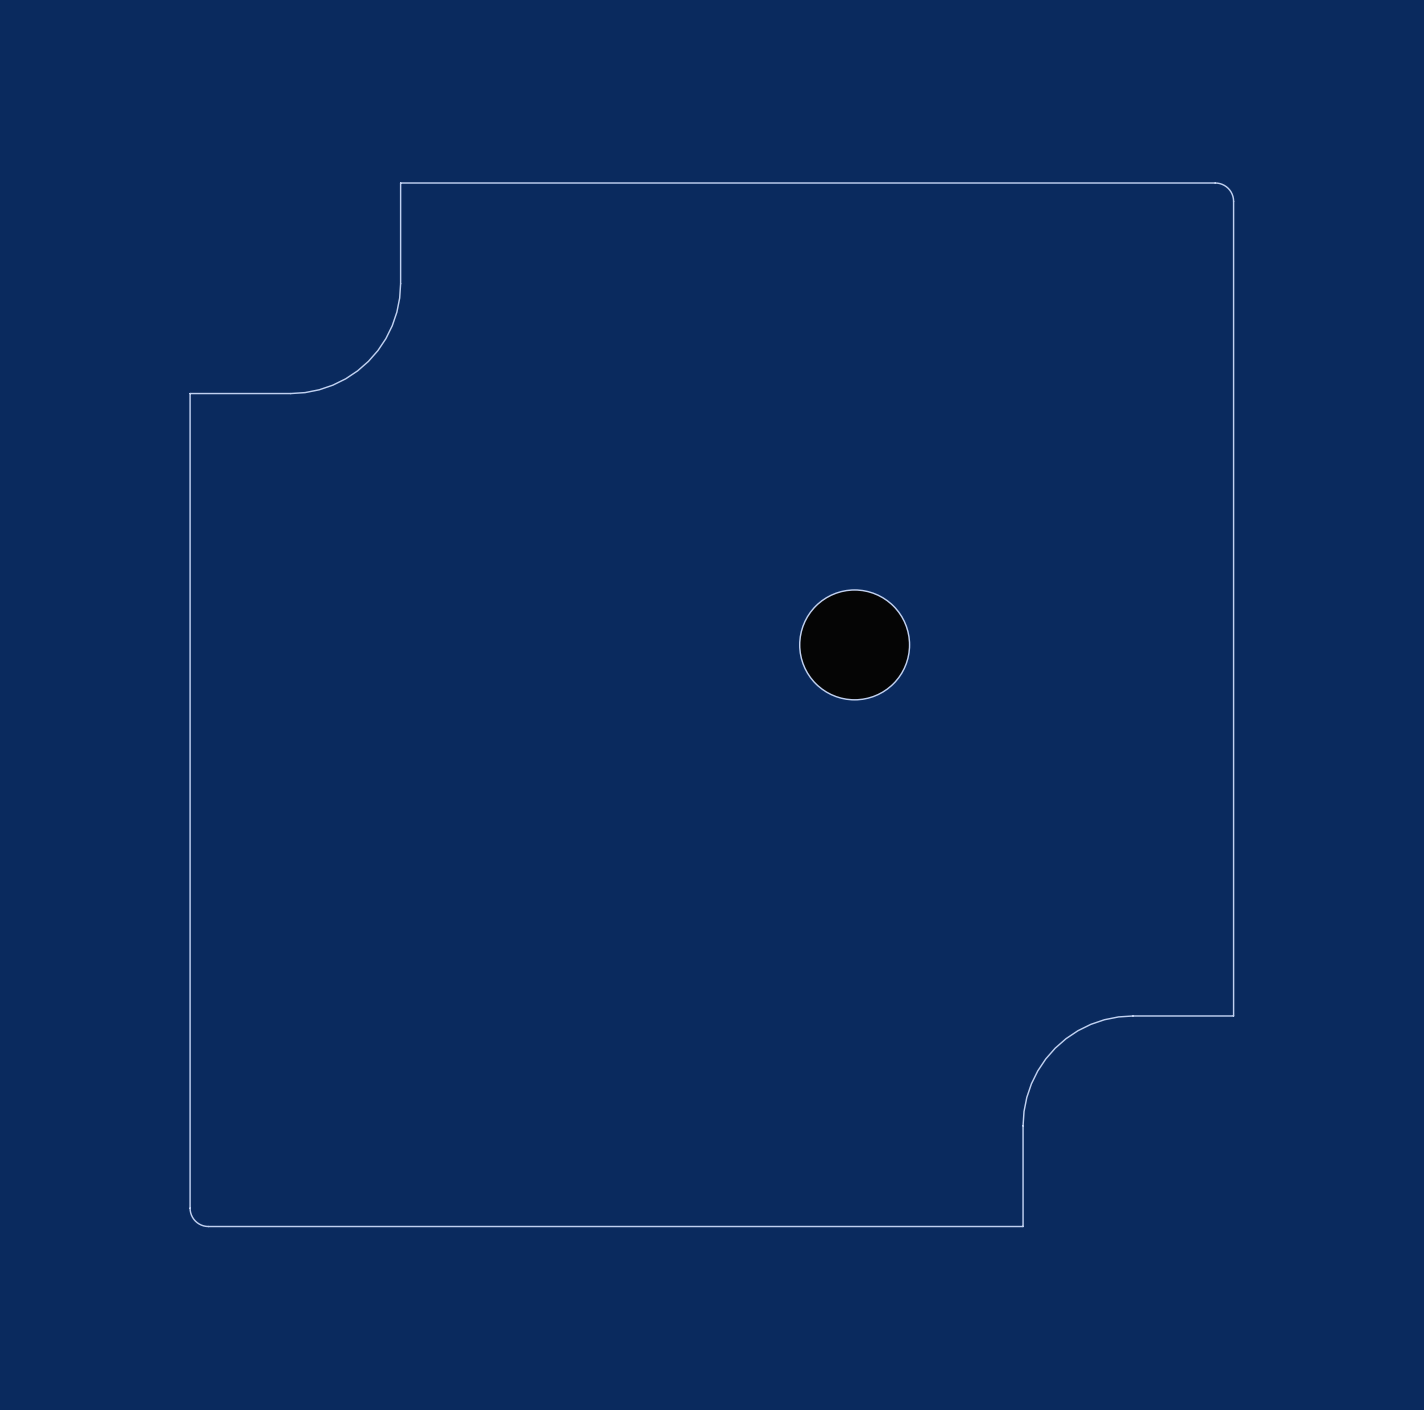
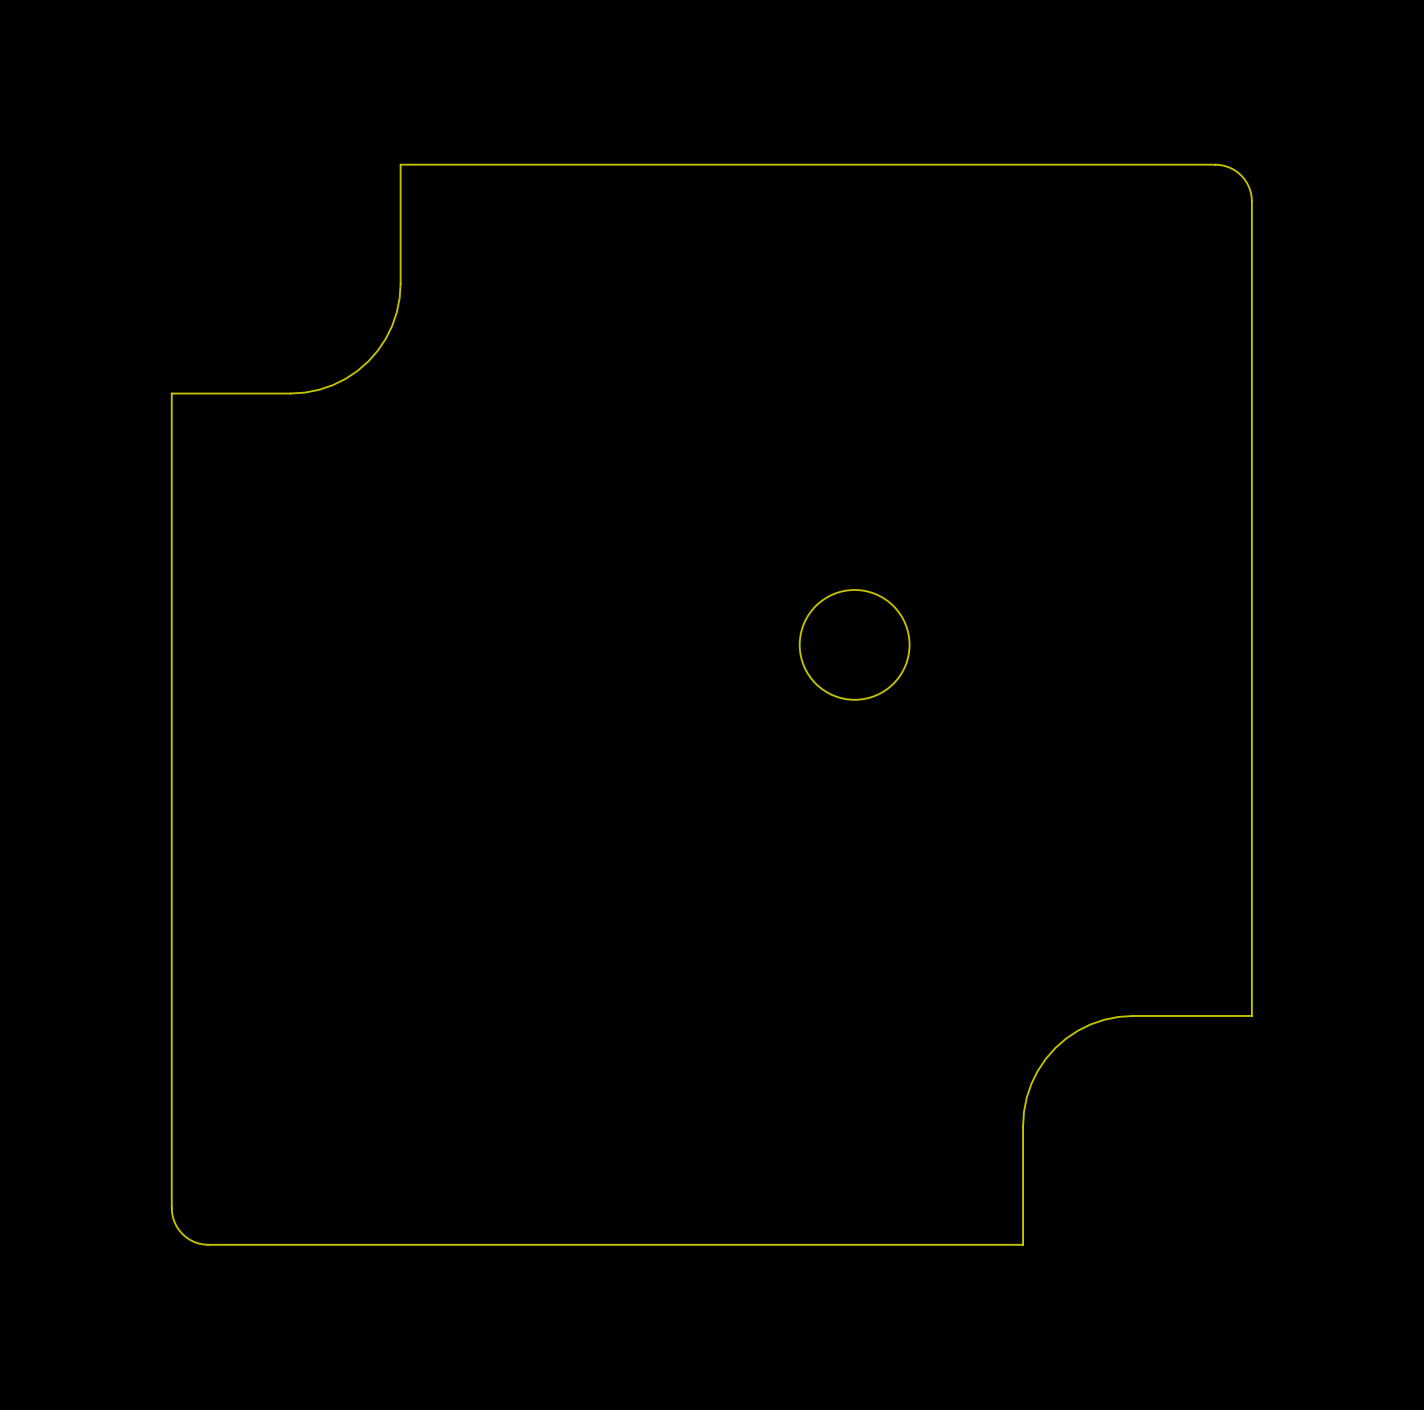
board edge: (400, 183) (1215, 183) (1228, 188) (1233, 201) (1233, 1015) -> (400, 183) (400, 164) (1215, 164) (1229, 167) (1241, 175) (1249, 187) (1251, 201) (1251, 1015) (1233, 1015)
board edge: (190, 393) (190, 1208) (195, 1221) (208, 1226) (1023, 1226) -> (190, 393) (171, 393) (171, 1208) (174, 1222) (182, 1234) (194, 1242) (208, 1244) (1023, 1244) (1023, 1226)

